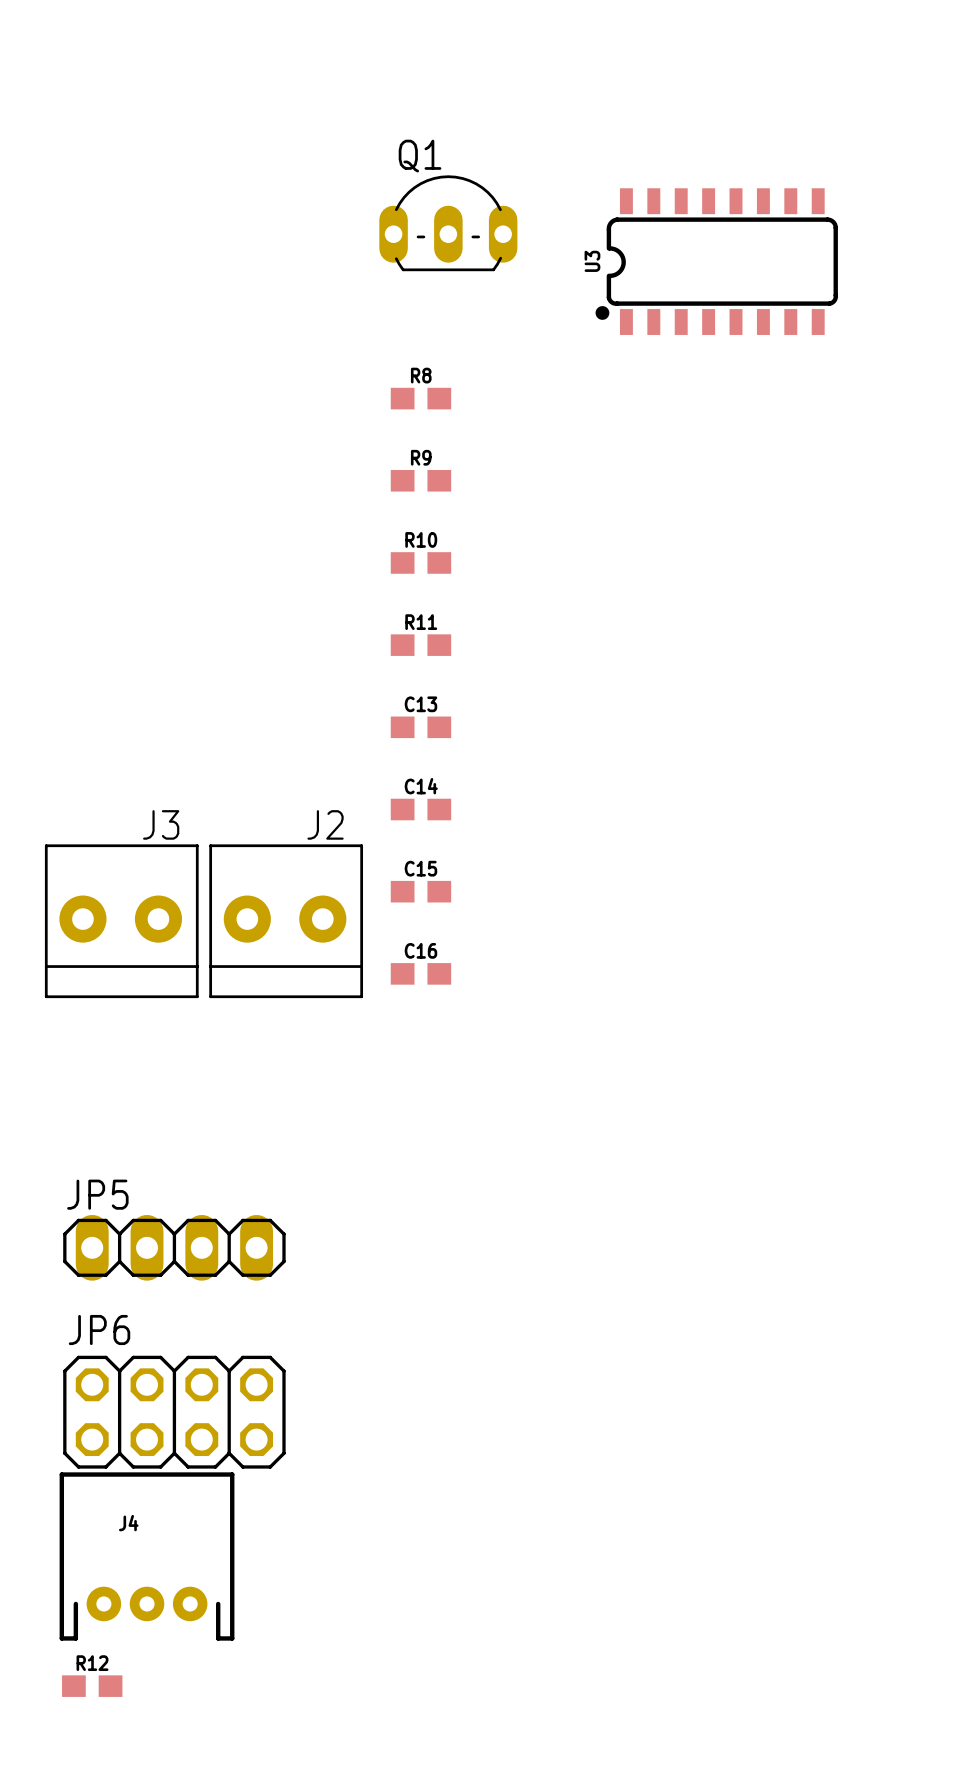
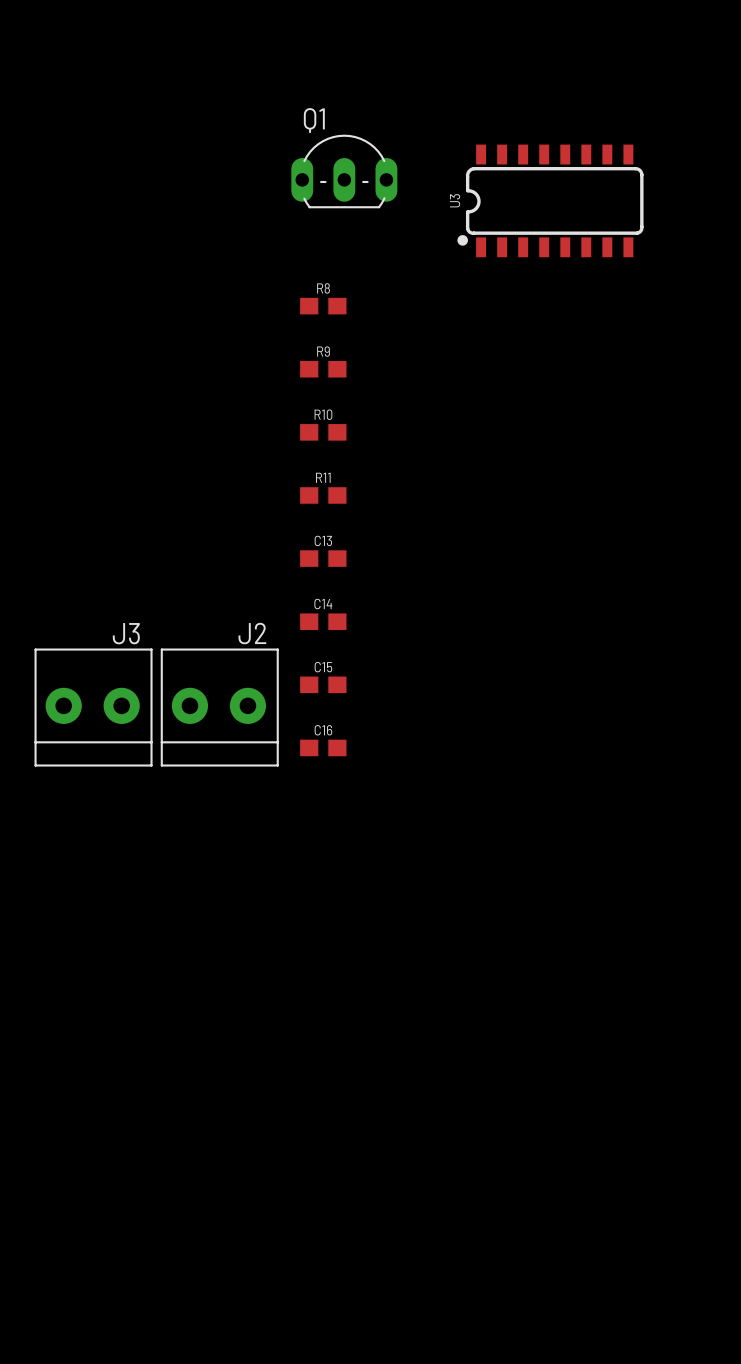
JP5: (174, 1247) -> none
JP6: (174, 1412) -> none
J4: (147, 1556) -> none
R12: (92, 1686) -> none

